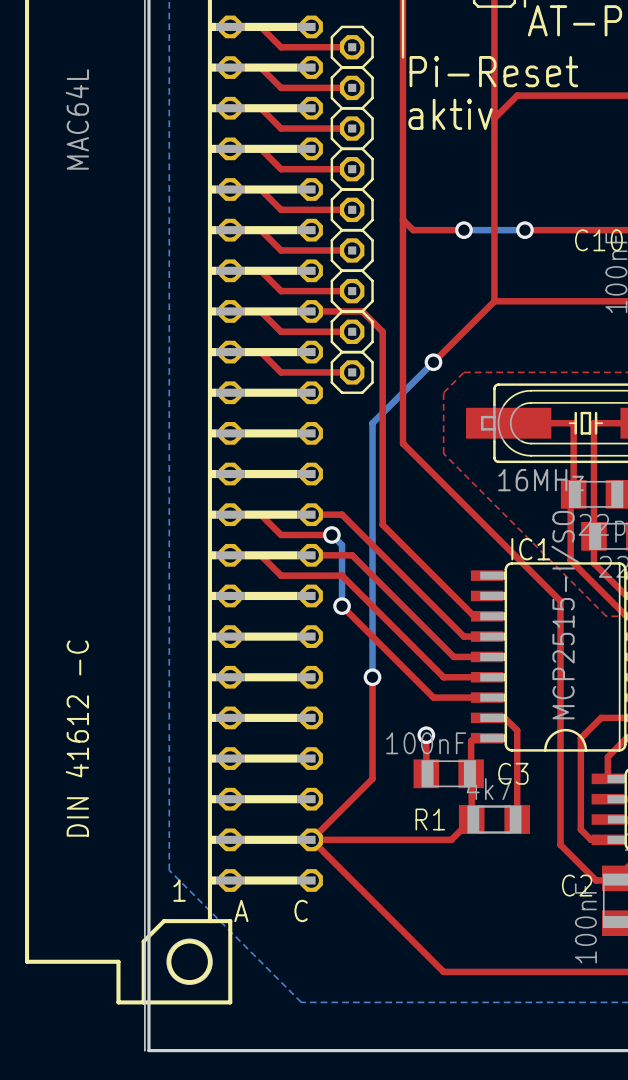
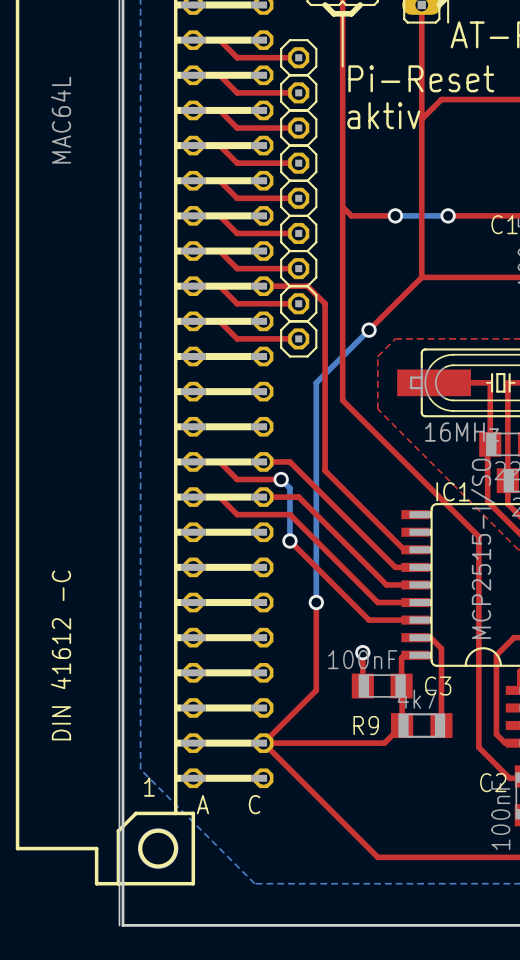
R1 name: R1 (430, 819) -> R9 (366, 725)

